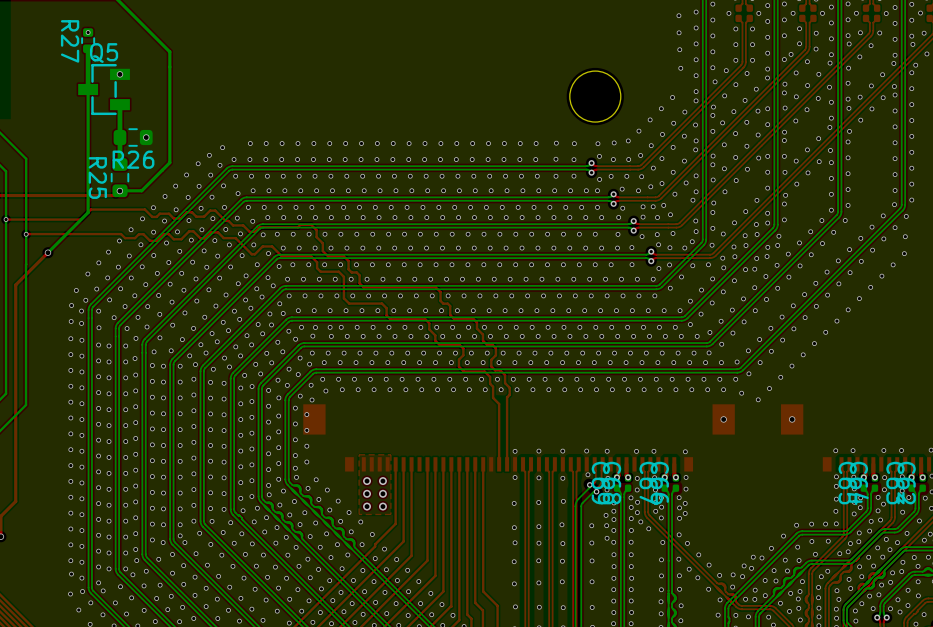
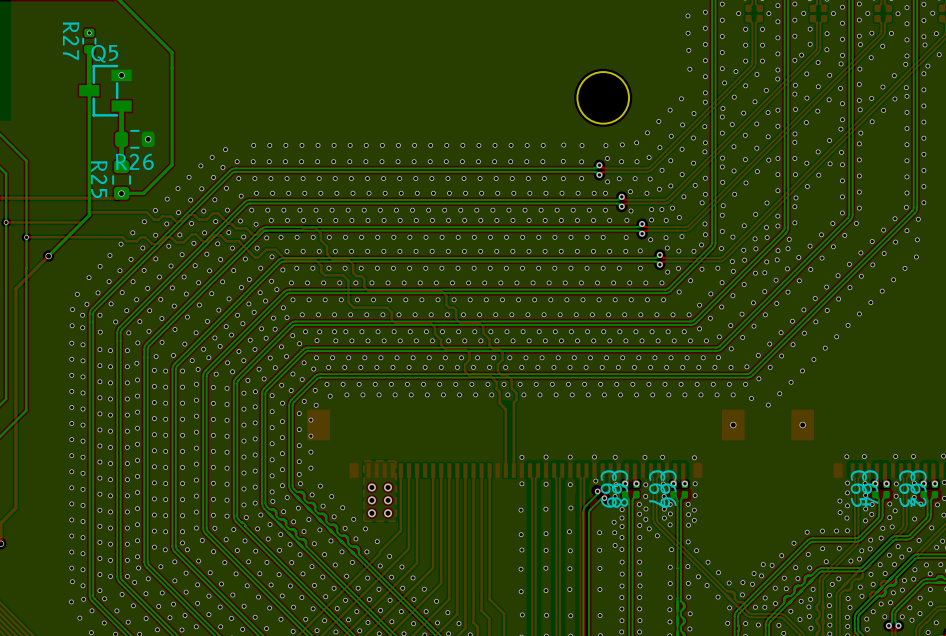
via: none -> (839, 501)
via: none -> (840, 512)

